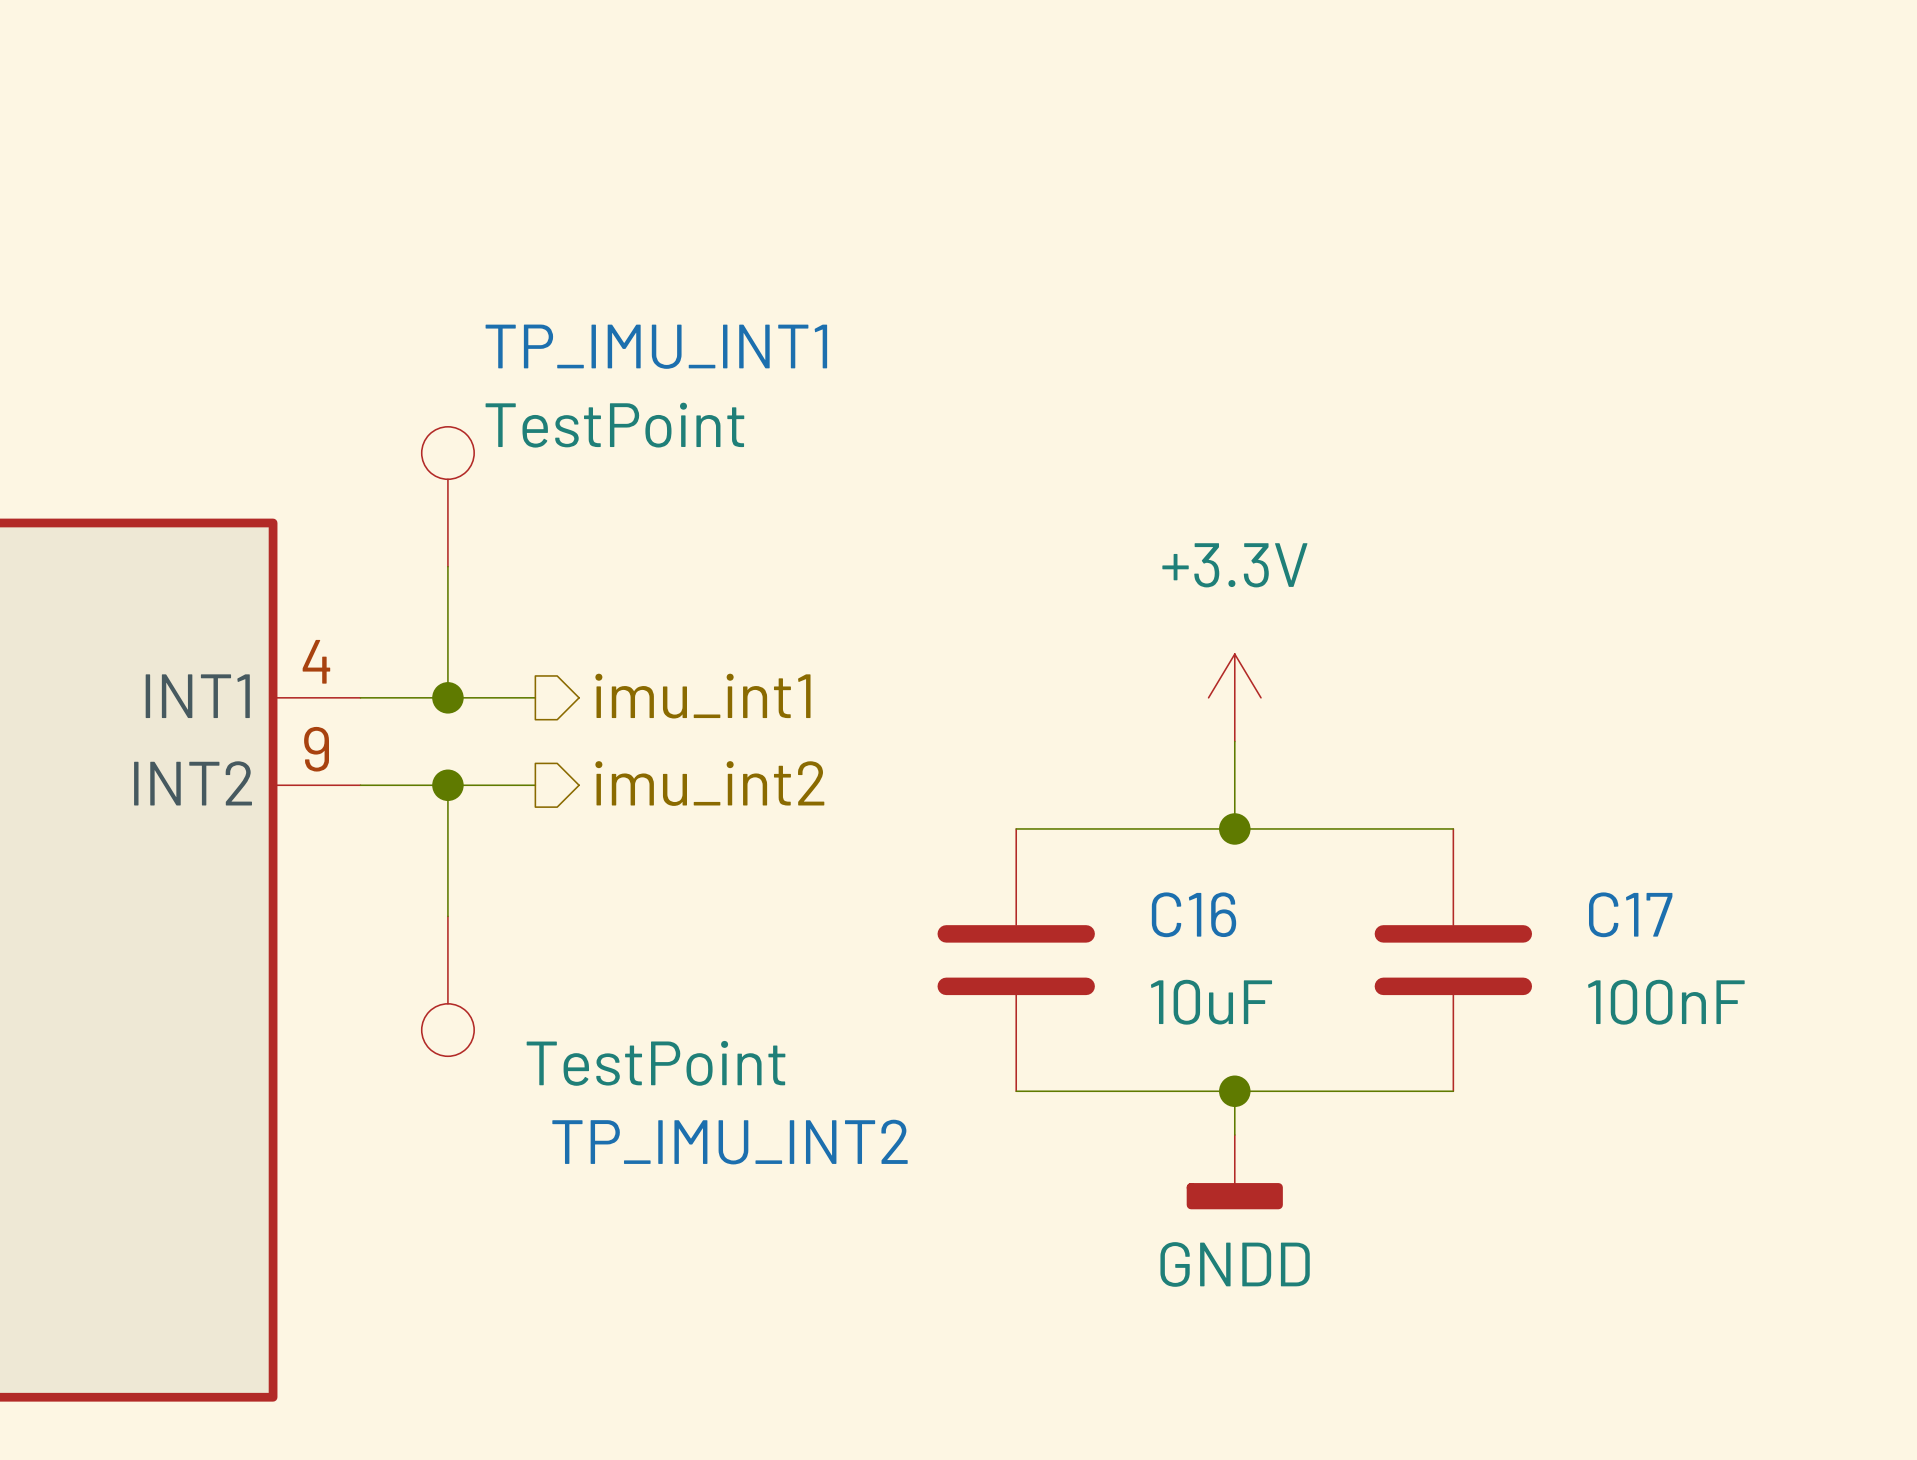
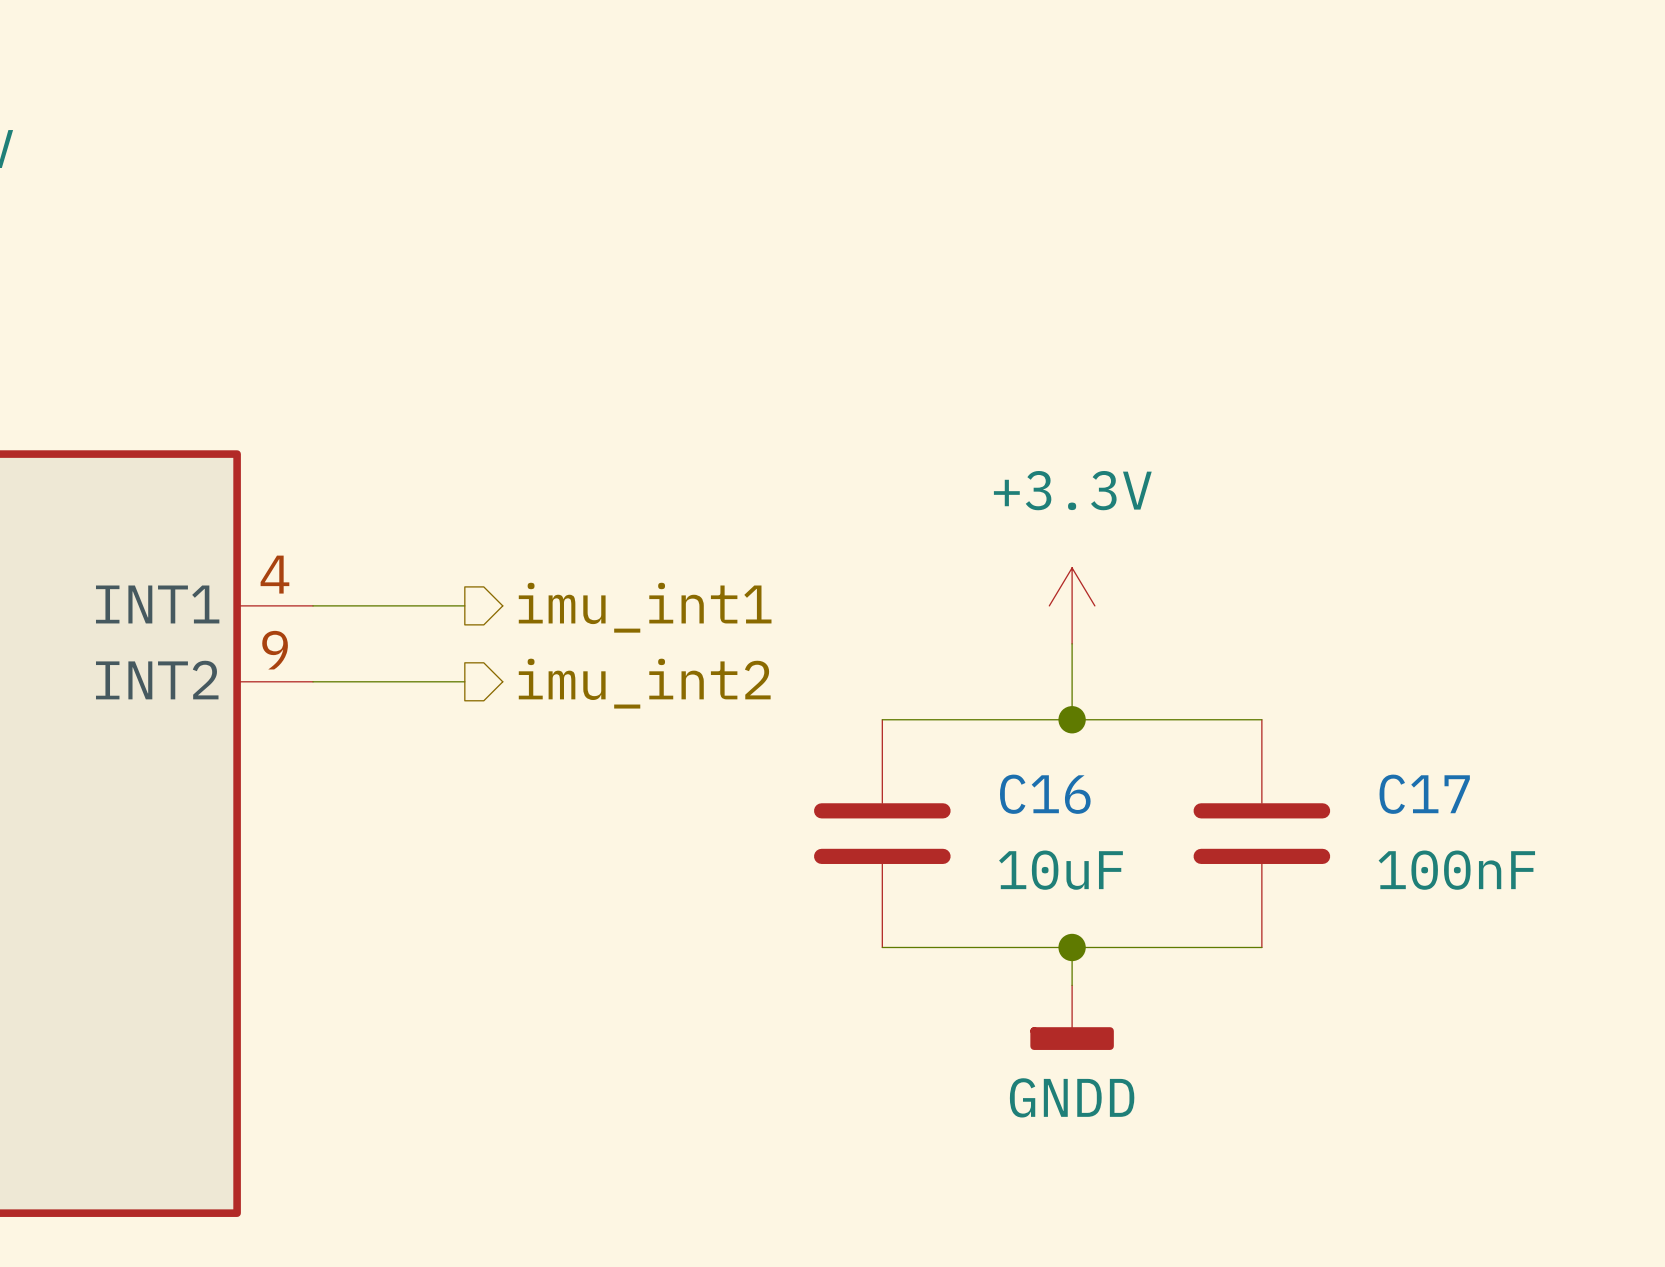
TP_IMU_INT1: TestPoint (447, 496) -> none
wire: (447, 566) (447, 697) -> none
junction: (447, 697) -> none
wire: (447, 785) (447, 916) -> none
junction: (447, 785) -> none
TP_IMU_INT2: TestPoint (447, 986) -> none

